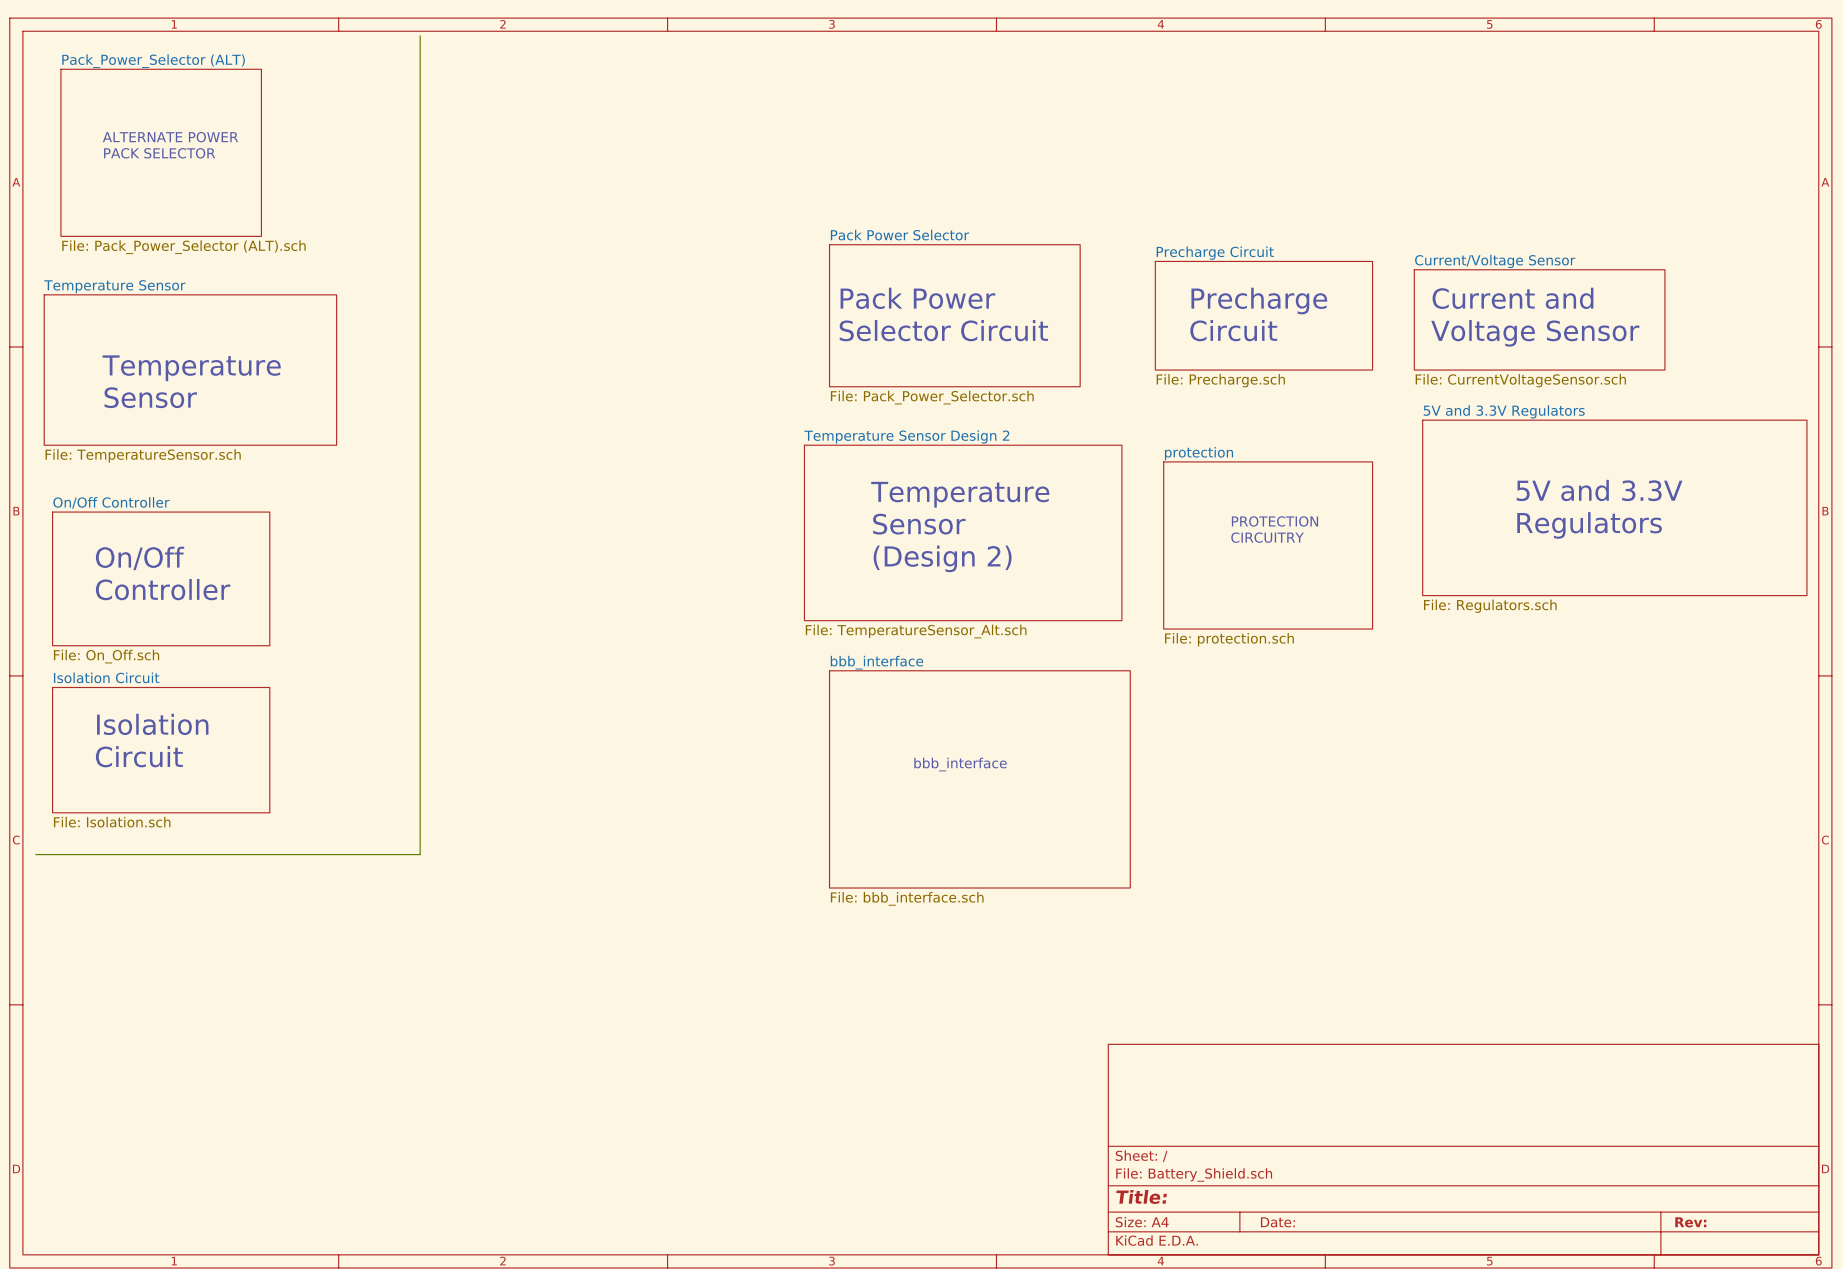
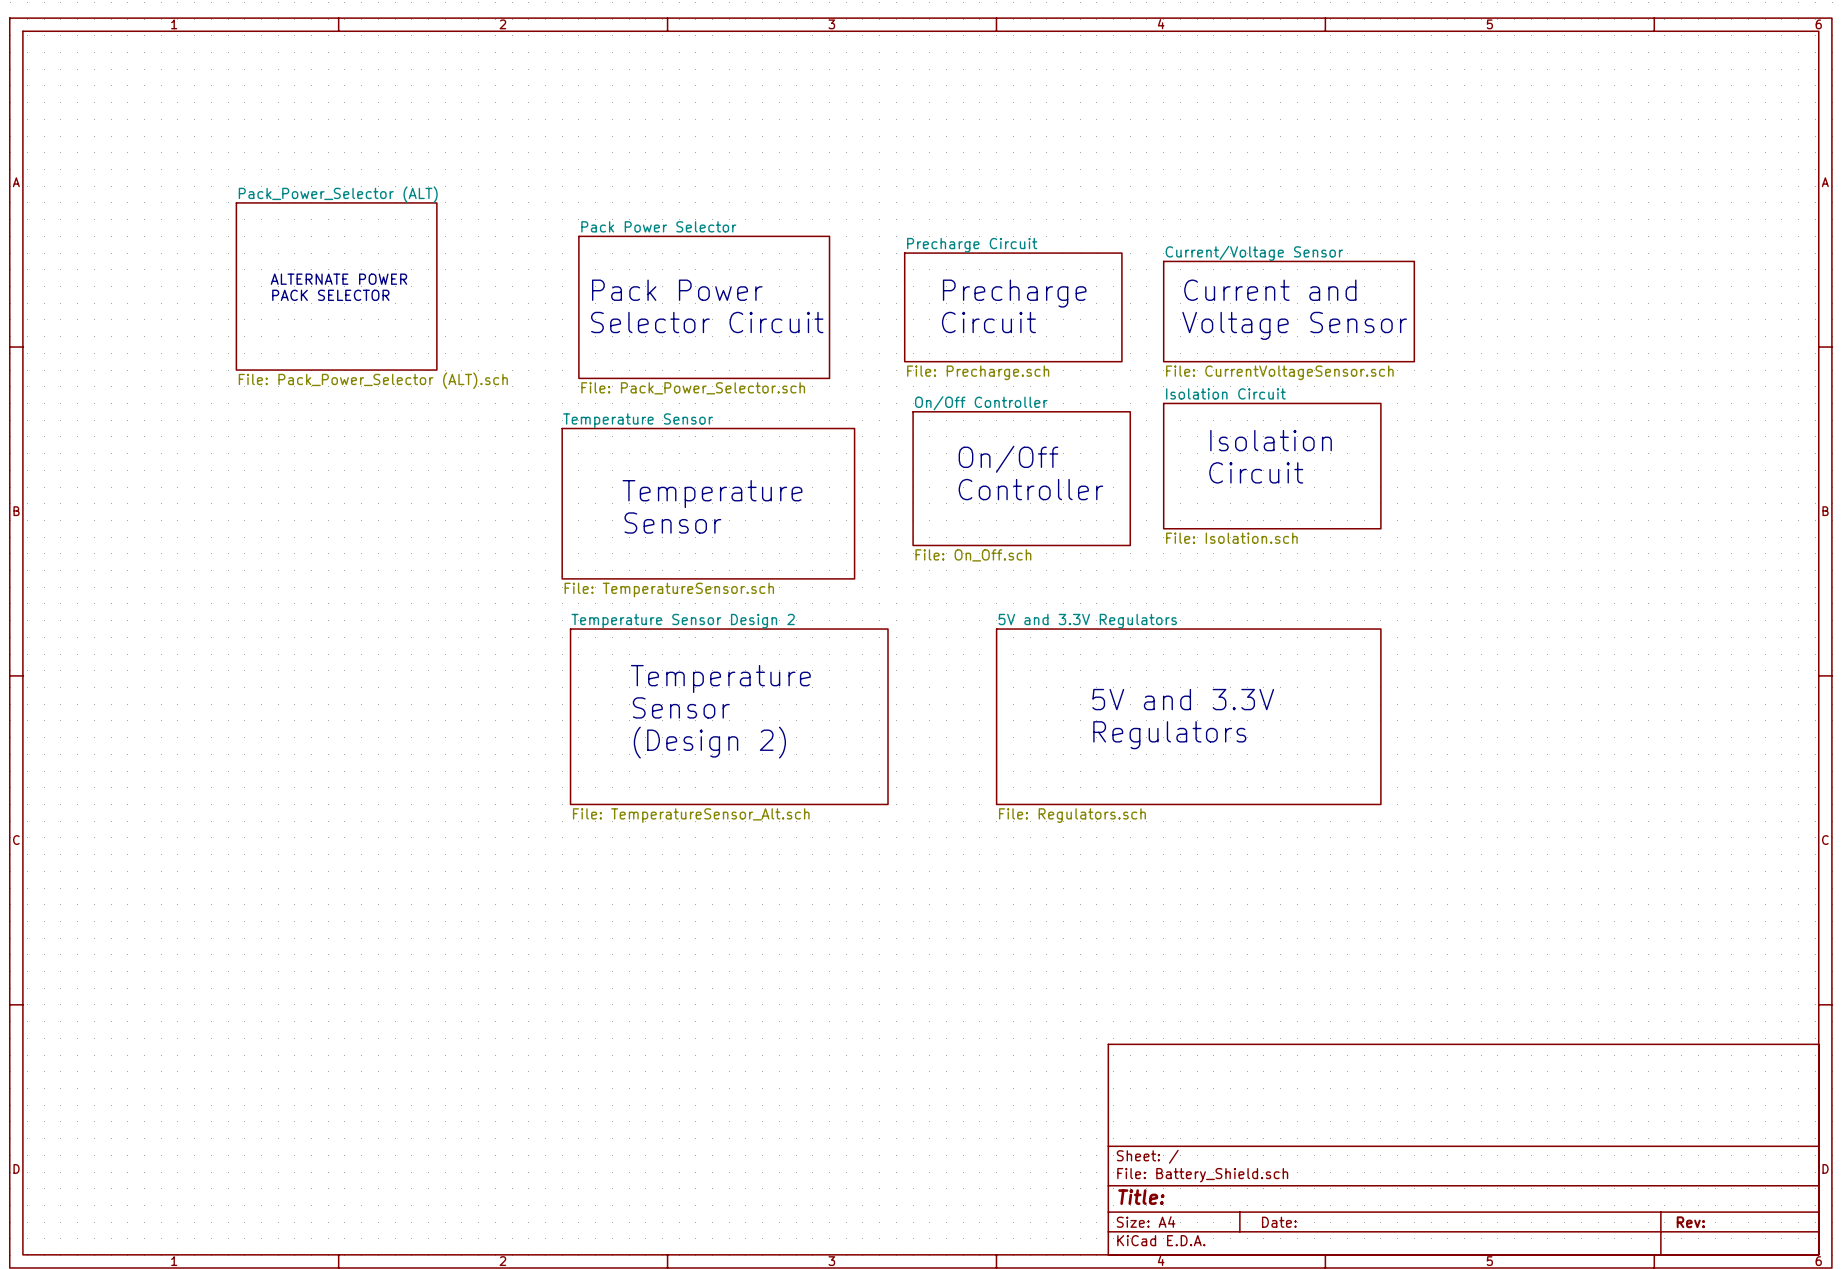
wire: (420, 35) (420, 854) (35, 854) -> none
text: ALTERNATE POWER (170, 137) -> none
sheet Pack_Power_Selector (ALT): File: Pack_Power_Selector (ALT).sch (161, 152) -> none
text: PACK SELECTOR (159, 153) -> none
text: none -> ALTERNATE POWER (338, 279)
sheet Pack_Power_Selector (ALT): none -> File: Pack_Power_Selector (ALT).sch (336, 286)
text: none -> Pack Power (677, 290)
text: none -> Current and (1270, 290)
text: none -> Precharge (1014, 293)
text: none -> PACK SELECTOR (330, 295)
text: Pack Power (917, 298) -> none
text: Current and (1512, 298) -> none
text: Precharge (1259, 301) -> none
sheet Pack Power Selector: none -> File: Pack_Power_Selector.sch (704, 307)
sheet Precharge Circuit: none -> File: Precharge.sch (1013, 307)
sheet Current/Voltage Sensor: none -> File: CurrentVoltageSensor.sch (1289, 311)
sheet Pack Power Selector: File: Pack_Power_Selector.sch (954, 315) -> none
sheet Precharge Circuit: File: Precharge.sch (1263, 315) -> none
sheet Current/Voltage Sensor: File: CurrentVoltageSensor.sch (1539, 319) -> none
text: none -> Selector Circuit (707, 322)
text: none -> Voltage Sensor (1294, 325)
text: Selector Circuit (943, 330) -> Circuit (988, 322)
text: Circuit (1233, 330) -> none
text: Voltage Sensor (1535, 333) -> none
text: Temperature (191, 368) -> none
sheet Temperature Sensor: File: TemperatureSensor.sch (190, 370) -> none
text: Sensor (150, 397) -> none
text: none -> Isolation (1271, 440)
text: none -> On/Off (1008, 459)
sheet Isolation Circuit: none -> File: Isolation.sch (1272, 466)
text: none -> Circuit (1256, 472)
sheet On/Off Controller: none -> File: On_Off.sch (1021, 478)
text: none -> Controller (1030, 489)
text: 5V and 3.3V (1599, 490) -> none
text: none -> Temperature (712, 494)
text: Temperature (960, 494) -> none
sheet Temperature Sensor: none -> File: TemperatureSensor.sch (708, 503)
sheet 5V and 3.3V Regulators position: (1614, 507) -> (1188, 716)
text: PROTECTION (1274, 521) -> none
text: none -> Sensor (672, 523)
text: Sensor (919, 524) -> none
text: Regulators (1589, 525) -> none
sheet Temperature Sensor Design 2 position: (963, 532) -> (729, 716)
text: CIRCUITRY (1267, 537) -> none
sheet protection: File: protection.sch (1268, 545) -> none
text: On/Off (140, 558) -> none
text: (Design 2) (942, 558) -> none
sheet On/Off Controller: File: On_Off.sch (161, 578) -> none
text: Controller (163, 589) -> none
text: none -> Temperature (720, 678)
text: none -> 5V and 3.3V (1183, 699)
text: none -> Sensor (681, 707)
text: Isolation (152, 724) -> none
text: none -> Regulators (1169, 735)
text: none -> (Design 2) (709, 742)
sheet Isolation Circuit: File: Isolation.sch (161, 750) -> none
text: Circuit (139, 756) -> none
text: bbb_interface (960, 764) -> none
sheet bbb_interface: File: bbb_interface.sch (979, 779) -> none

